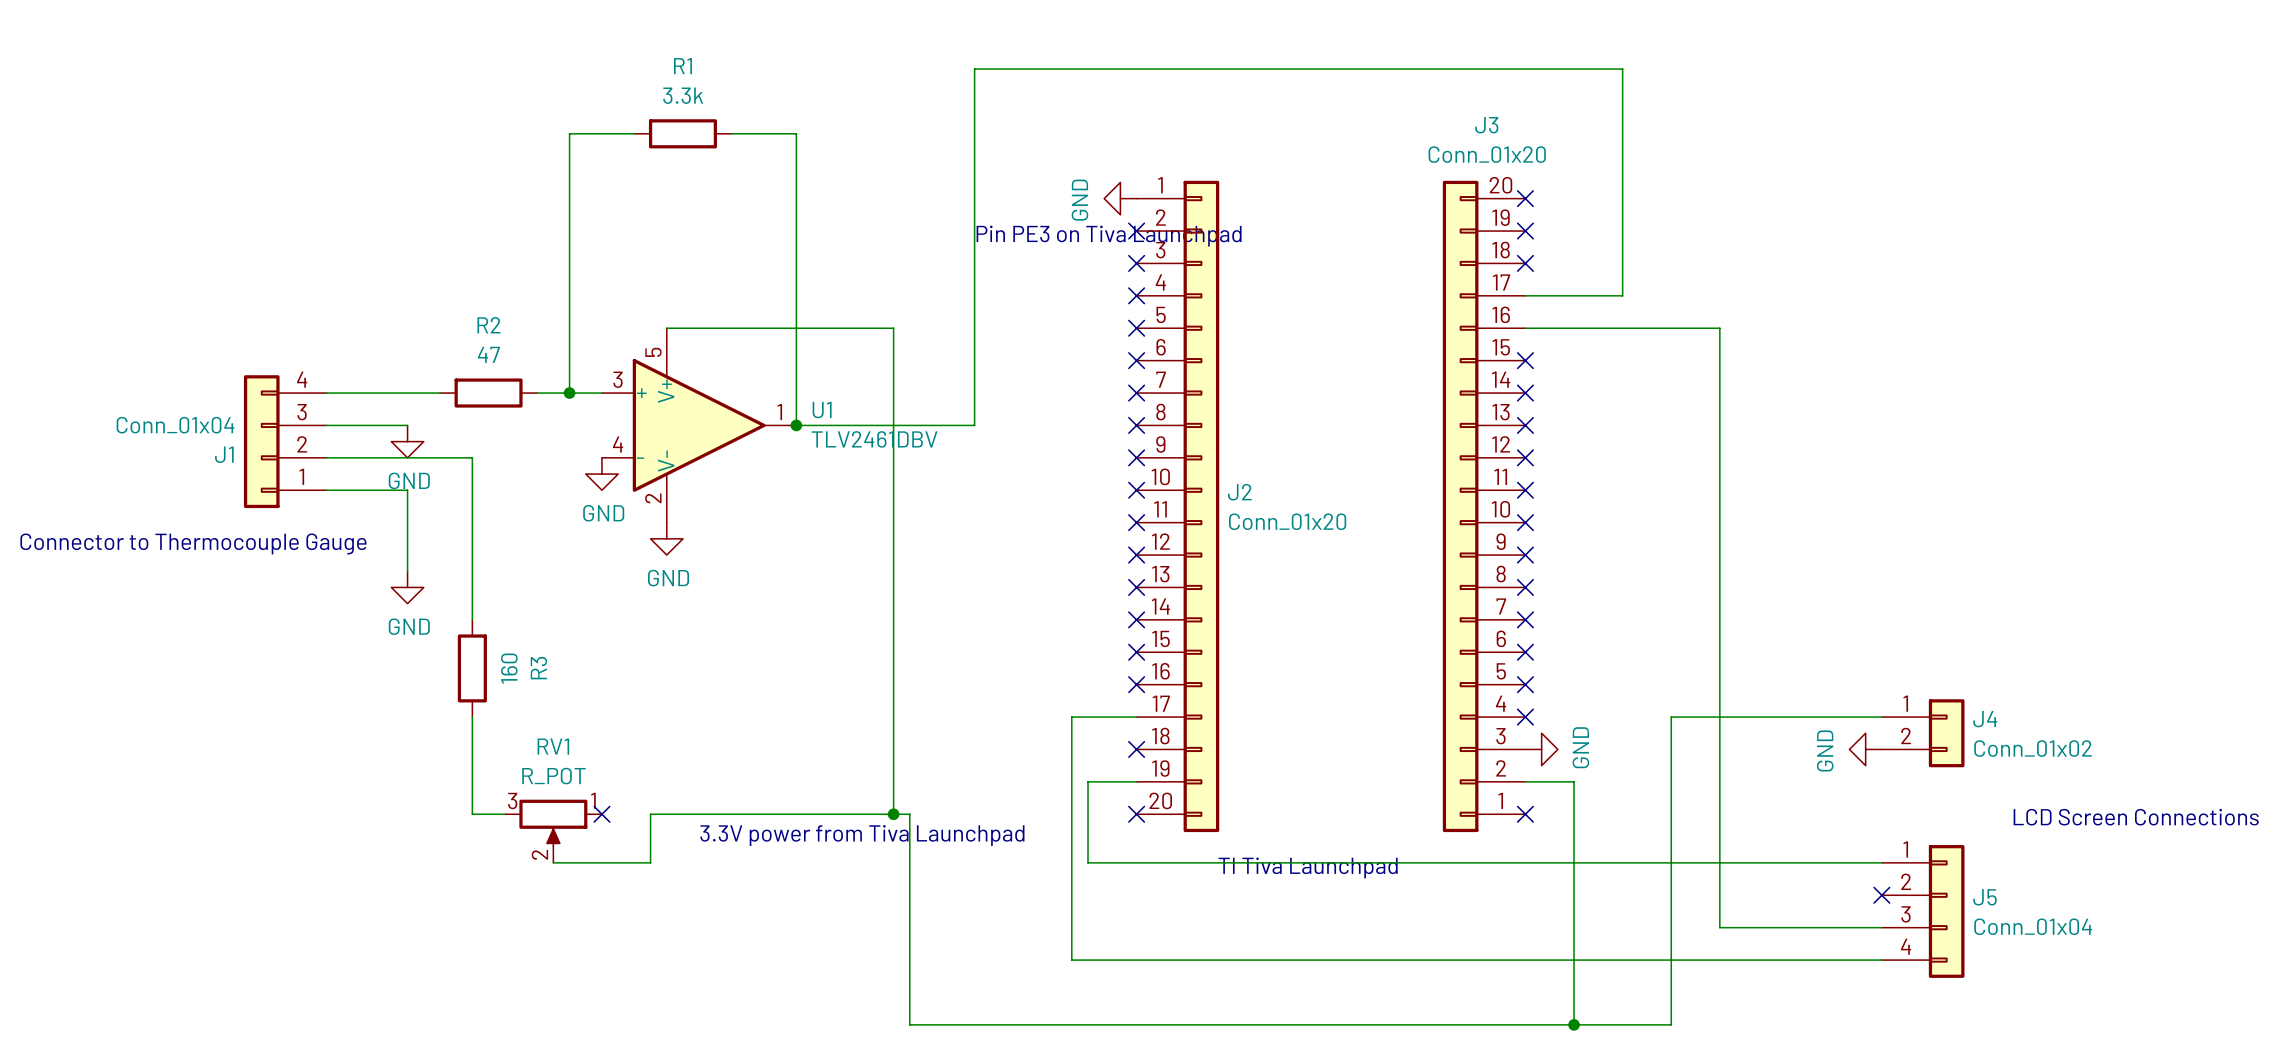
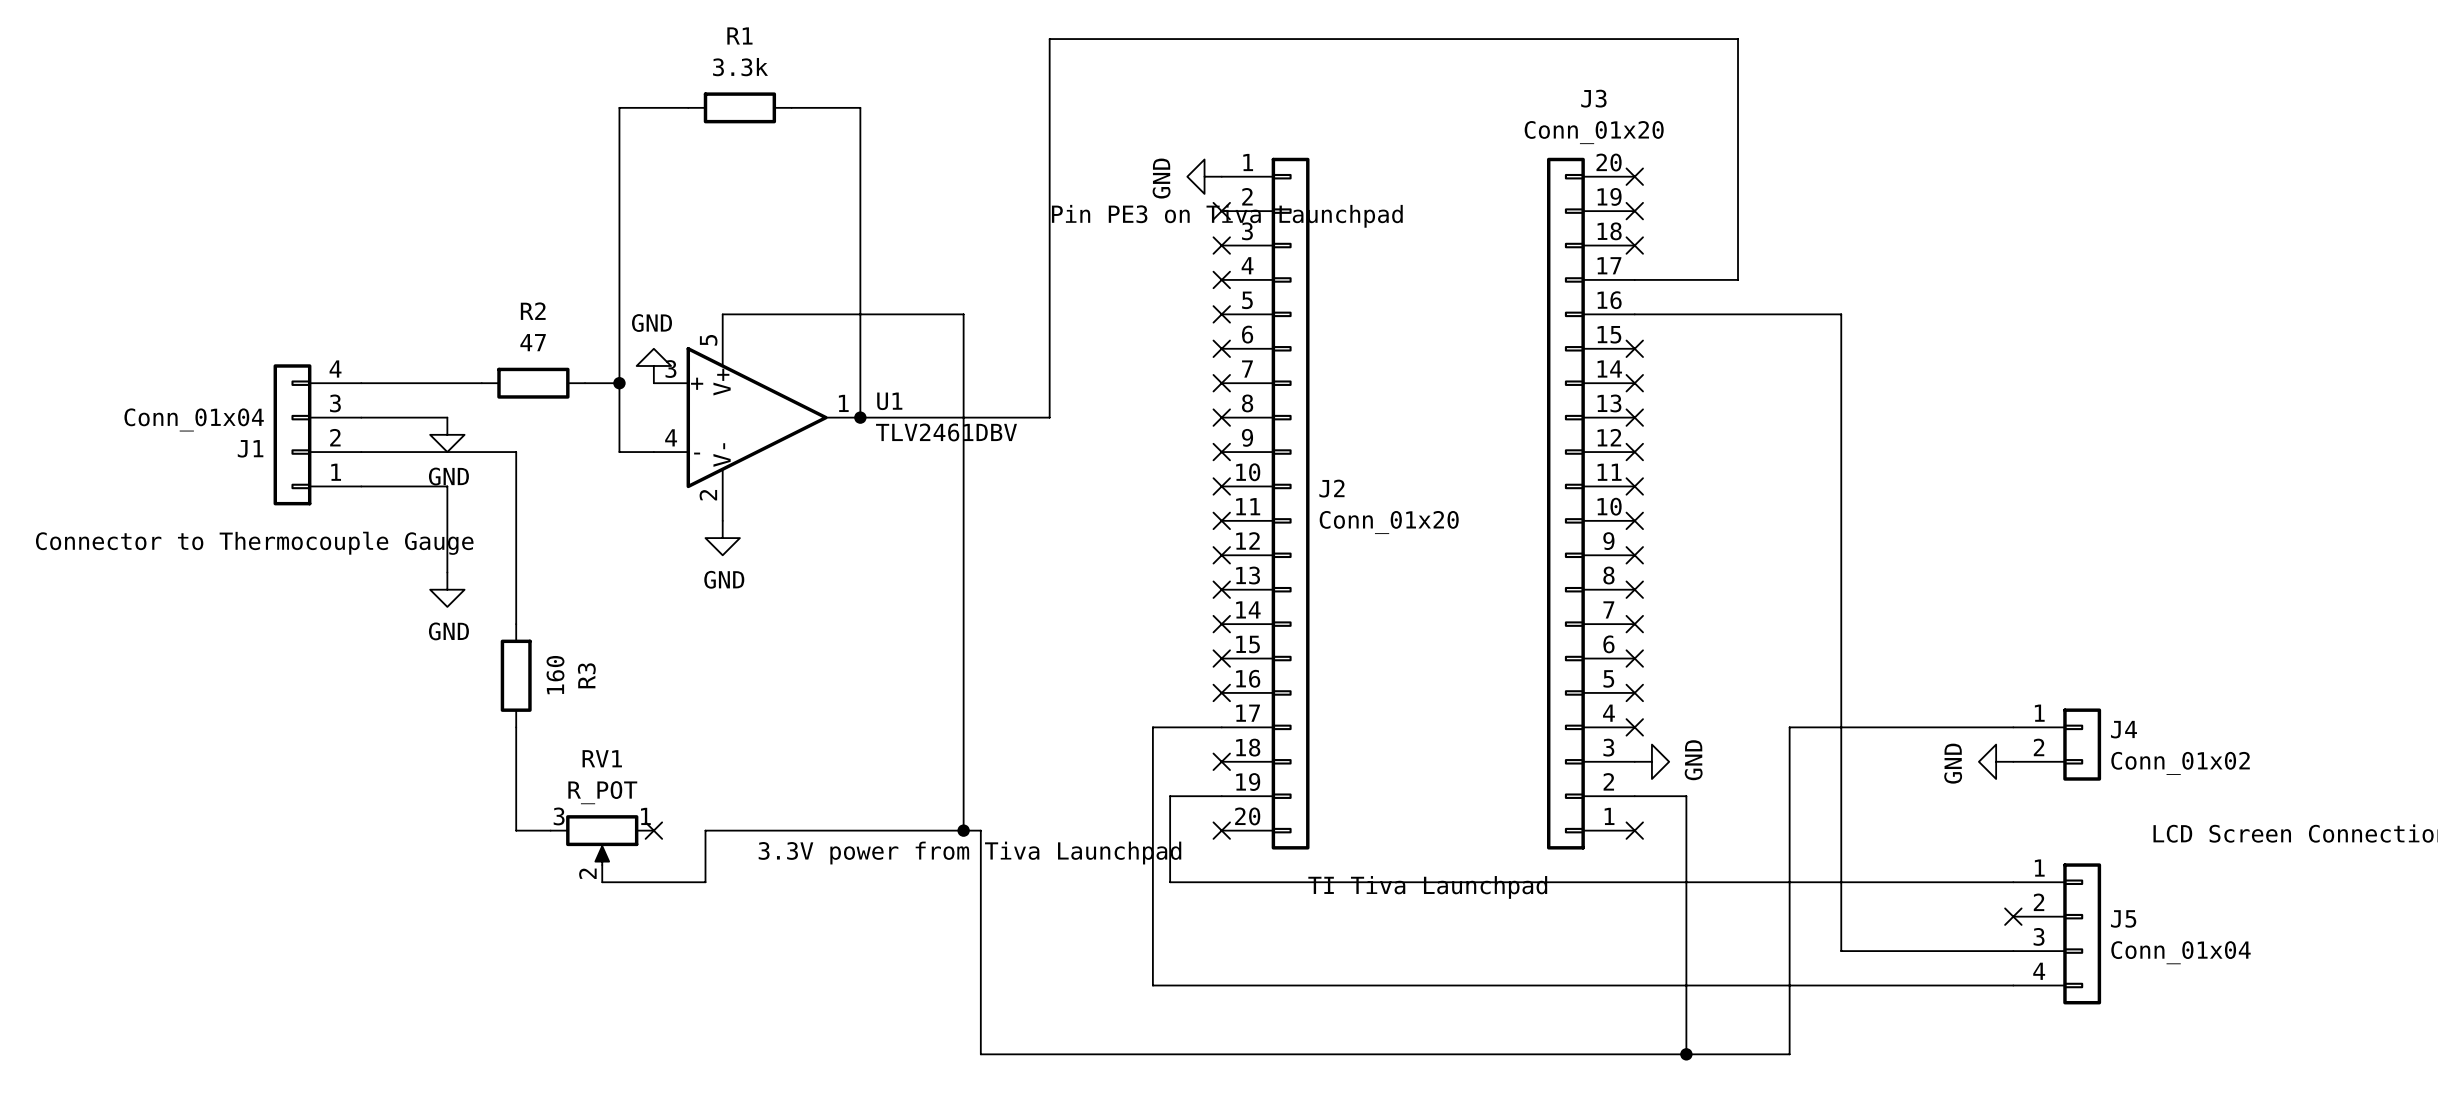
wire: (569, 393) (601, 393) -> (619, 383) (619, 452) (653, 452)
power symbol rotation: 0° (601, 474) -> 180° (653, 365)
power symbol position: GND (601, 474) -> GND (653, 365)

